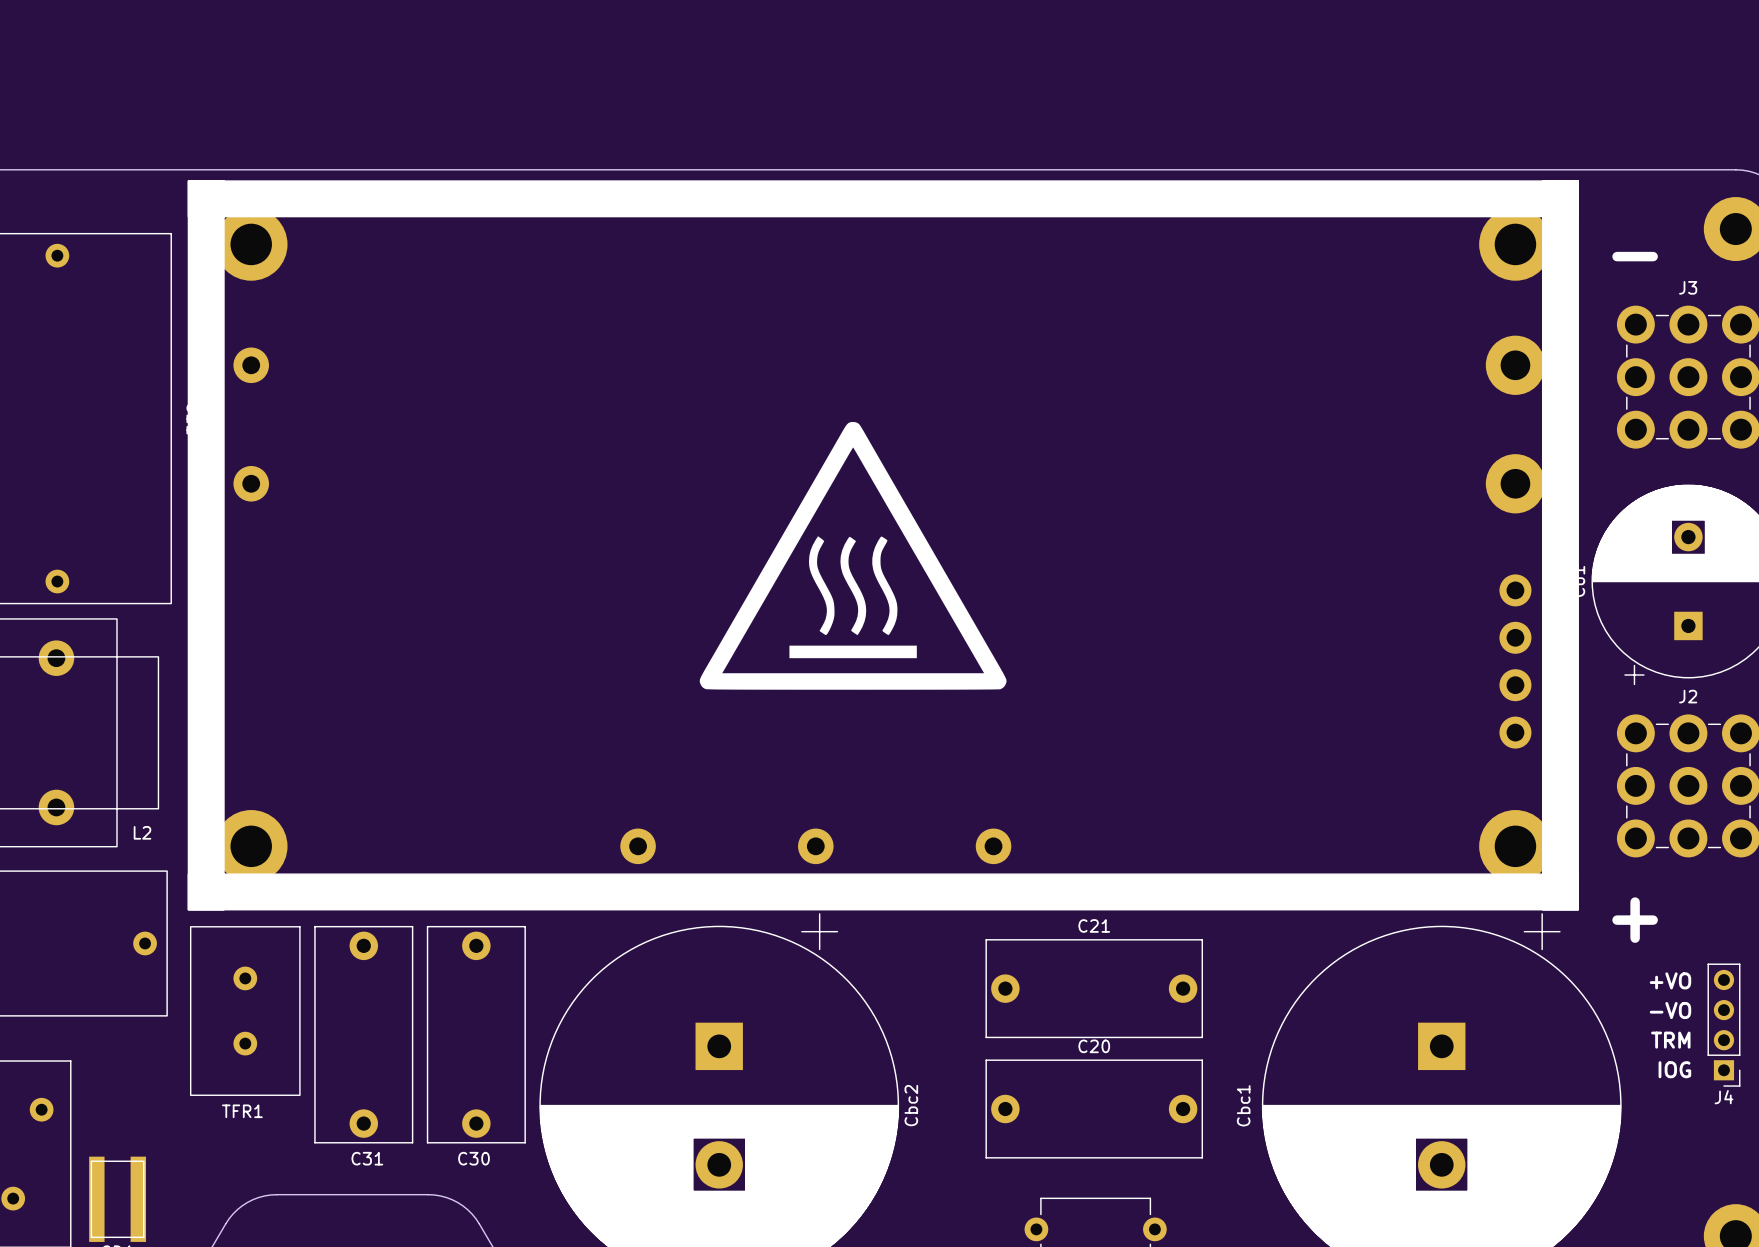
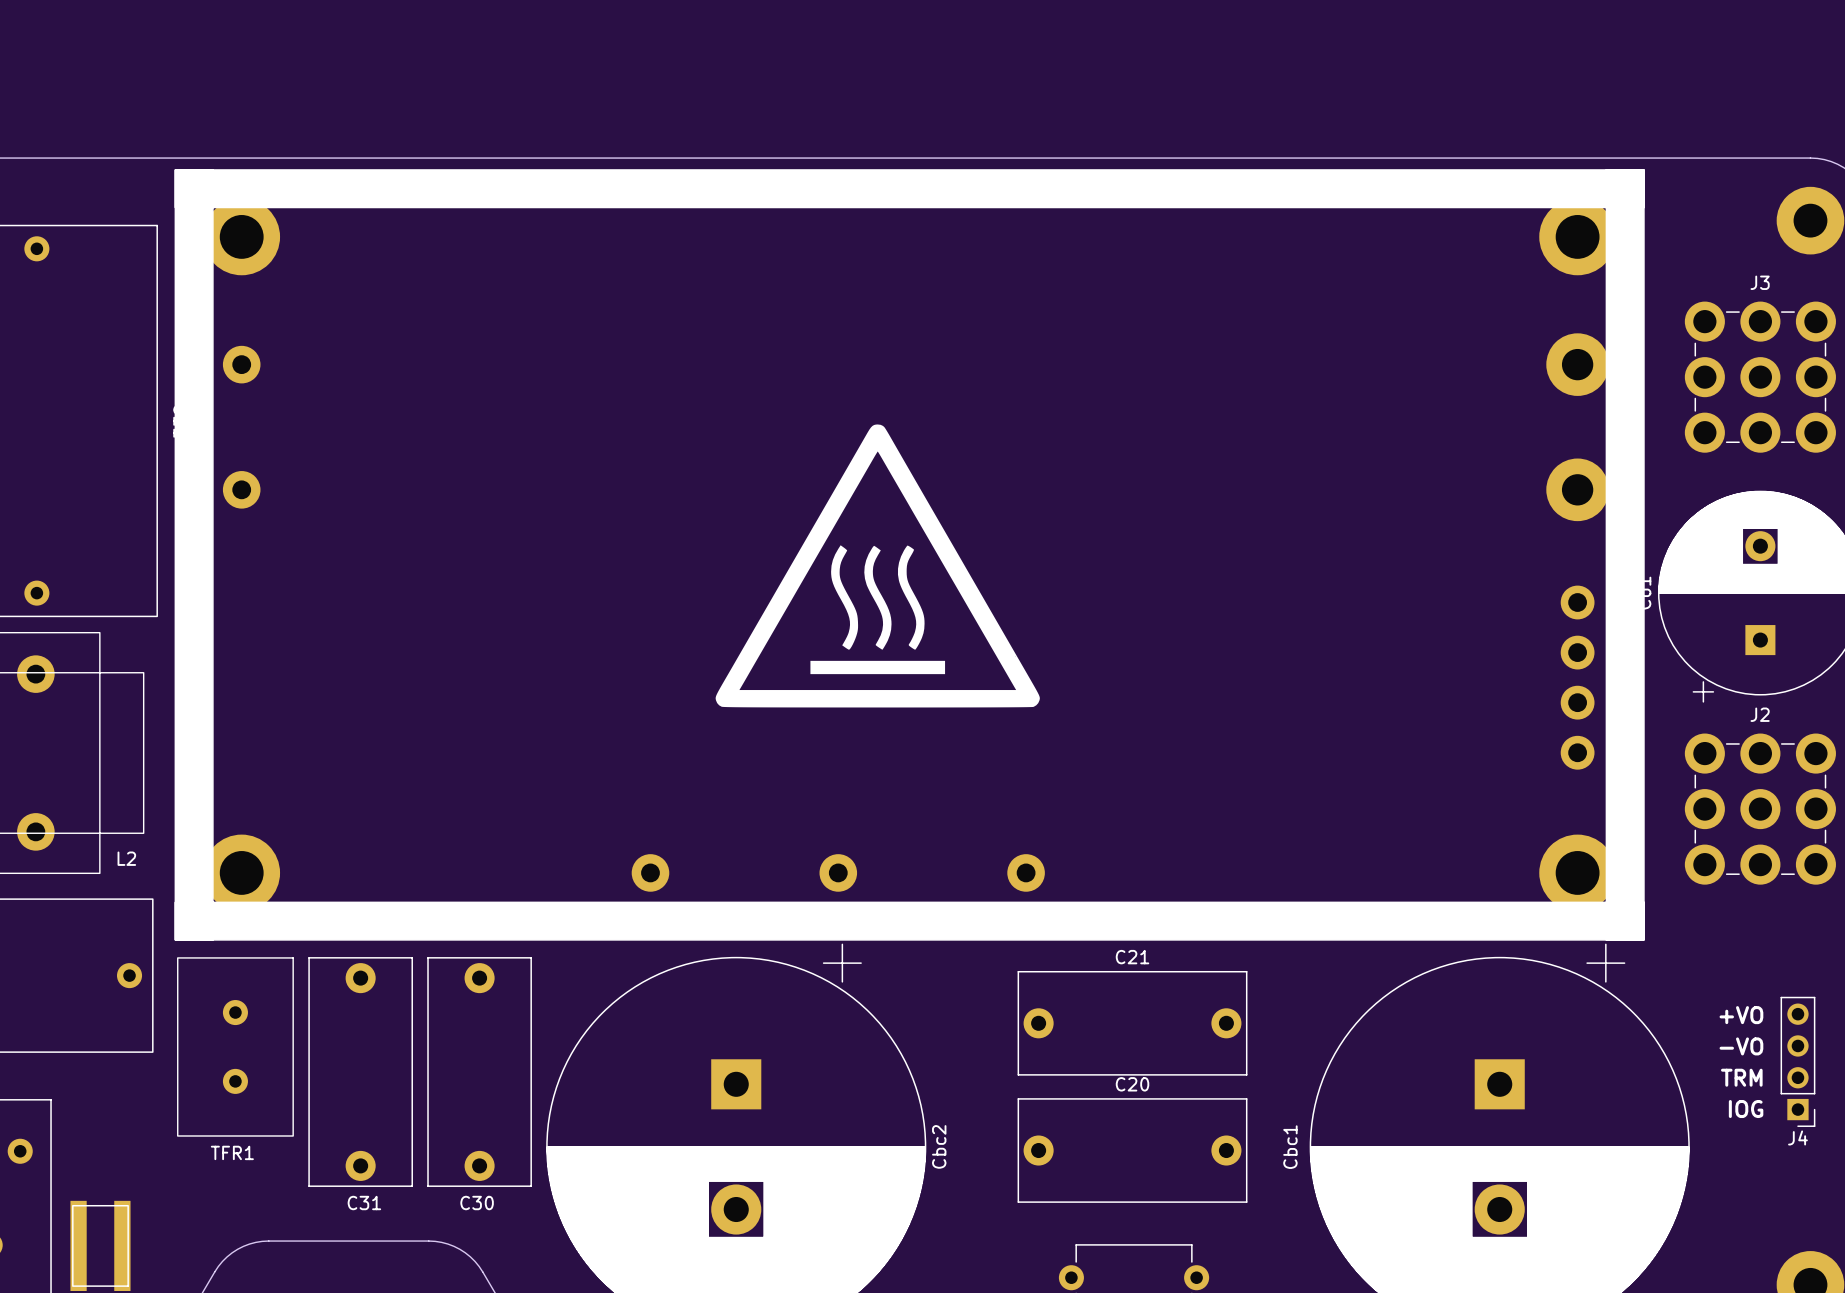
text: - (1635, 256) -> none
text: + (1635, 920) -> none

